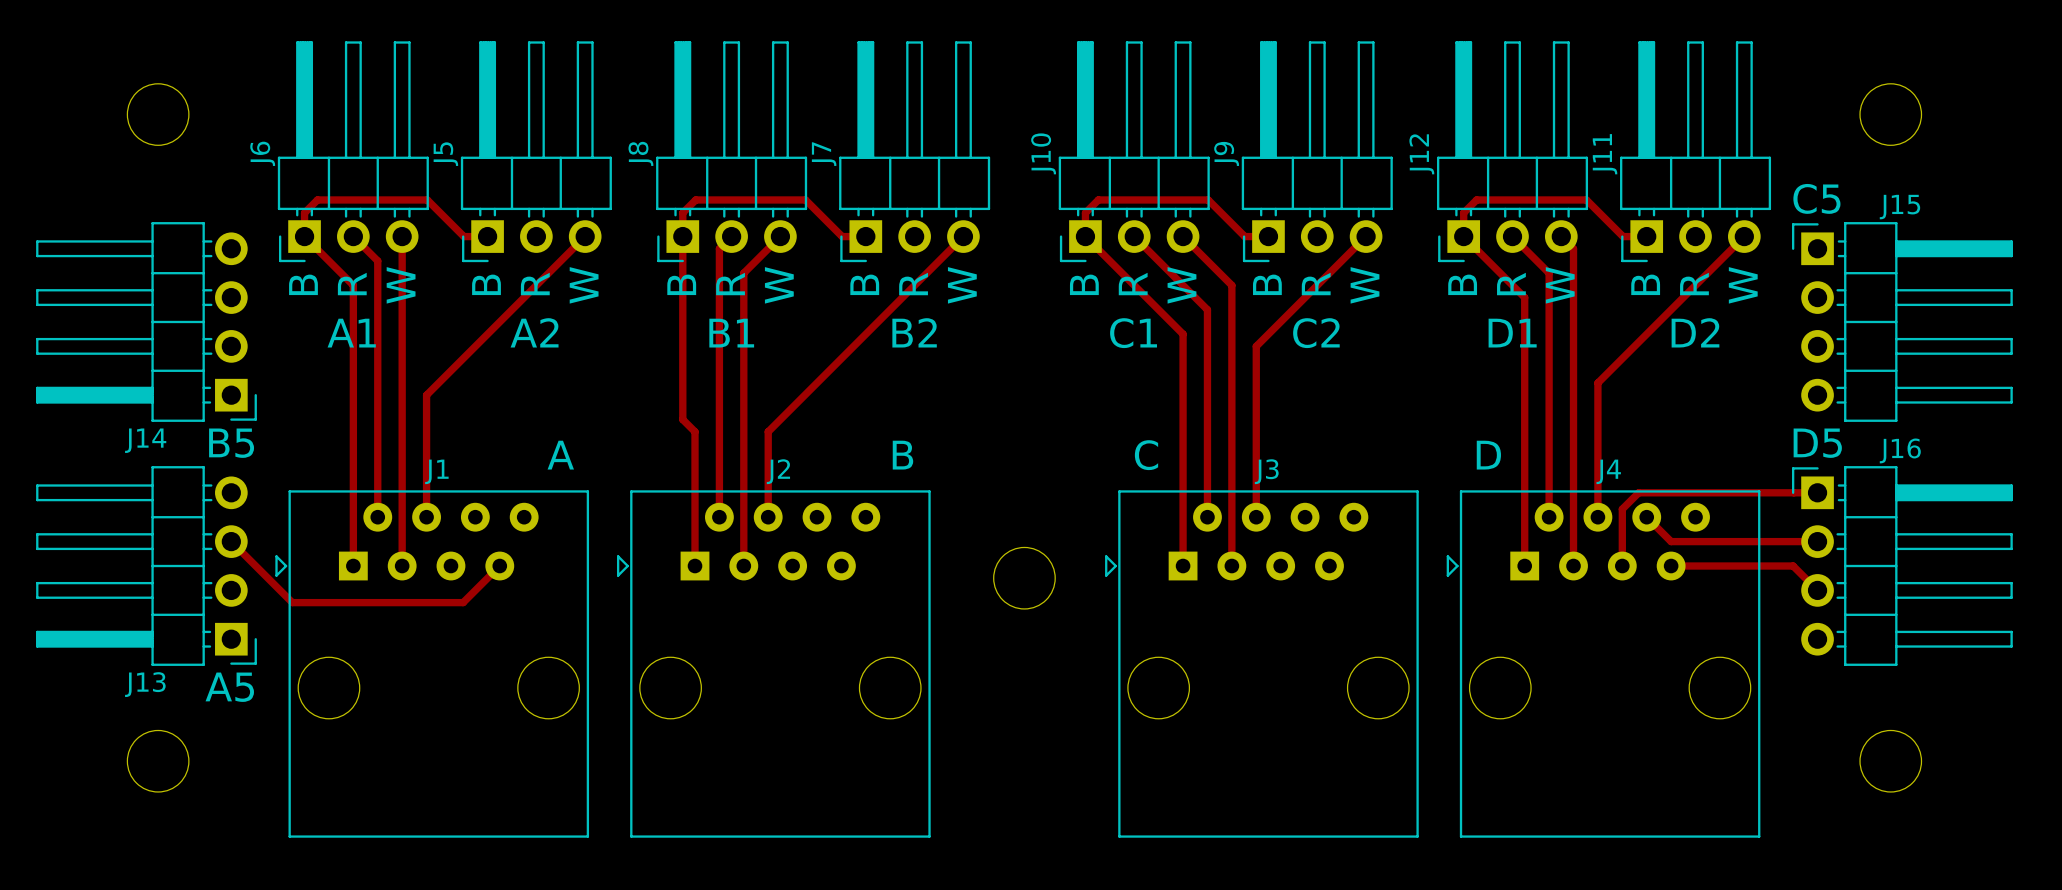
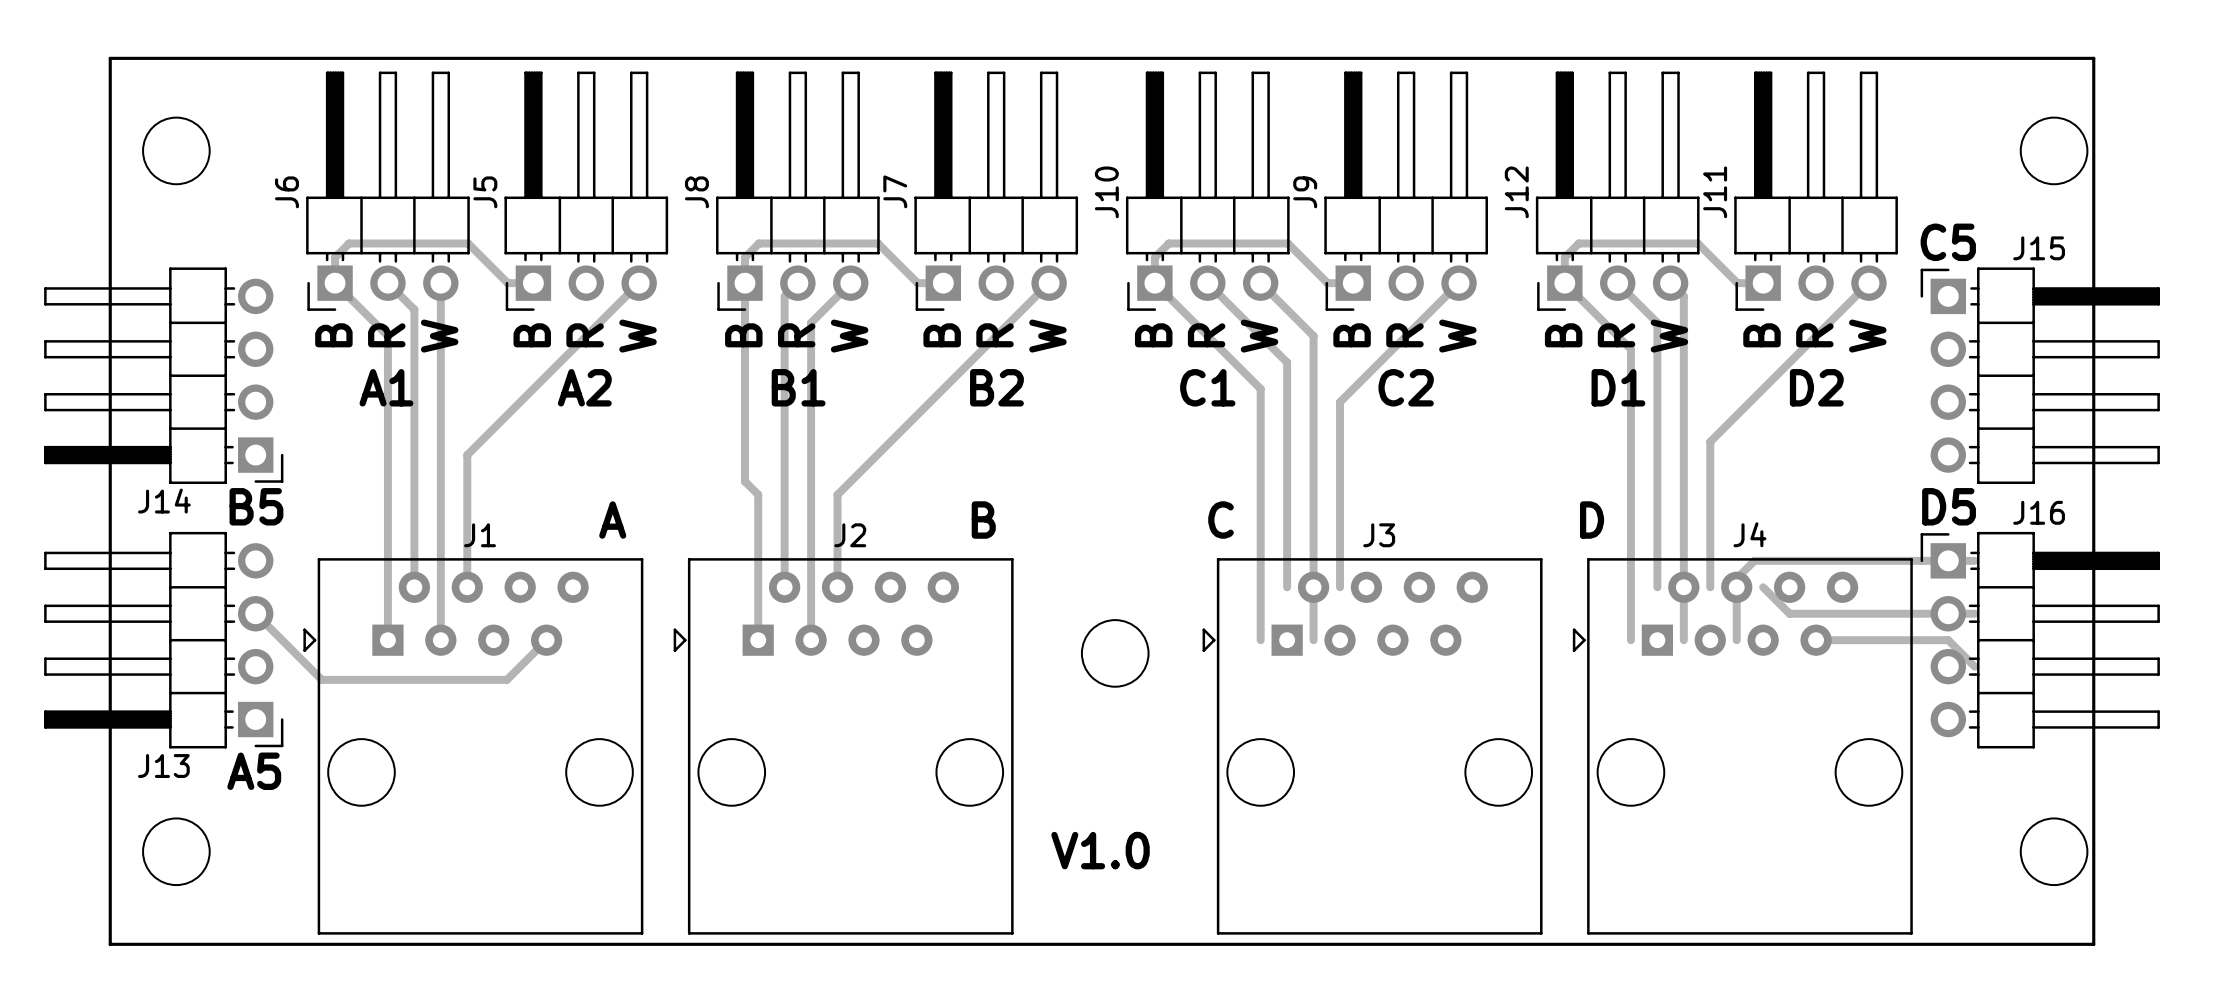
board edge: none -> (110, 58) (110, 944) (2093, 944) (2093, 58) (110, 58)
J10 position: (1134, 151) -> (1207, 191)
J9 position: (1317, 151) -> (1406, 191)
J12 position: (1512, 151) -> (1617, 191)
J11 position: (1695, 151) -> (1816, 191)
text position: C5 (1816, 198) -> C5 (1948, 242)
track: (1098, 199) (1085, 212) (1085, 236) (1183, 334) -> (1207, 283) (1287, 362) (1287, 388)
track: none -> (1195, 243) (1168, 243) (1154, 257) (1154, 283) (1260, 388) (1260, 640)
track: (1183, 199) (1208, 199) (1244, 236) (1268, 236) -> (1287, 243) (1327, 283) (1353, 283)
track: (1476, 199) (1463, 212) (1463, 236) (1524, 297) -> (1617, 283) (1657, 322) (1657, 349)
track: none -> (1605, 243) (1578, 243) (1564, 257) (1564, 283) (1630, 349) (1630, 640)
track: (1562, 199) (1586, 199) (1623, 236) (1646, 236) -> (1697, 243) (1737, 283) (1763, 283)
track: (1134, 236) (1207, 309) -> (1260, 283) (1313, 336) (1313, 362)
track: (1183, 236) (1231, 285) (1231, 346) -> (1459, 283) (1340, 402)
track: (1366, 236) (1256, 346) (1256, 517) -> none
track: (1512, 236) (1549, 273) -> (1670, 283) (1683, 296) (1683, 322)
track: (1561, 236) (1573, 248) (1573, 382) -> (1868, 283) (1710, 441)
track: (1744, 236) (1597, 382) (1597, 509) -> none
text position: B (1084, 284) -> B (1153, 335)
text position: R (1133, 284) -> R (1206, 335)
text position: B (1267, 284) -> B (1352, 335)
text position: R (1316, 284) -> R (1404, 335)
text position: B (1462, 284) -> B (1563, 335)
text position: R (1511, 284) -> R (1616, 335)
text position: B (1645, 284) -> B (1762, 335)
text position: R (1694, 284) -> R (1814, 335)
text position: W (1181, 285) -> W (1259, 336)
text position: W (1365, 285) -> W (1457, 336)
text position: W (1560, 285) -> W (1669, 336)
text position: W (1743, 285) -> W (1867, 336)
J15 position: (1902, 321) -> (2040, 375)
text position: D2 (1695, 332) -> D2 (1816, 387)
text position: C1 (1133, 333) -> C1 (1207, 387)
text position: C2 (1316, 333) -> C2 (1406, 387)
text position: D1 (1512, 333) -> D1 (1618, 387)
text position: D5 (1817, 443) -> D5 (1949, 506)
text position: C (1146, 455) -> C (1221, 520)
text position: D (1488, 455) -> D (1592, 520)
track: (1638, 492) (1622, 509) (1622, 566) -> (1780, 560) (1754, 560) (1736, 578)
track: (1183, 517) (1183, 566) -> (1313, 587) (1313, 640)
track: (1231, 517) (1231, 566) -> none
track: (1524, 517) (1524, 566) -> (1683, 587) (1683, 640)
track: (1573, 517) (1573, 566) -> (1736, 587) (1736, 640)
track: (1646, 517) (1671, 541) -> (1763, 587) (1789, 613) (1816, 613)
J16 position: (1902, 566) -> (2040, 640)
text: none -> V1.0 (1100, 850)

